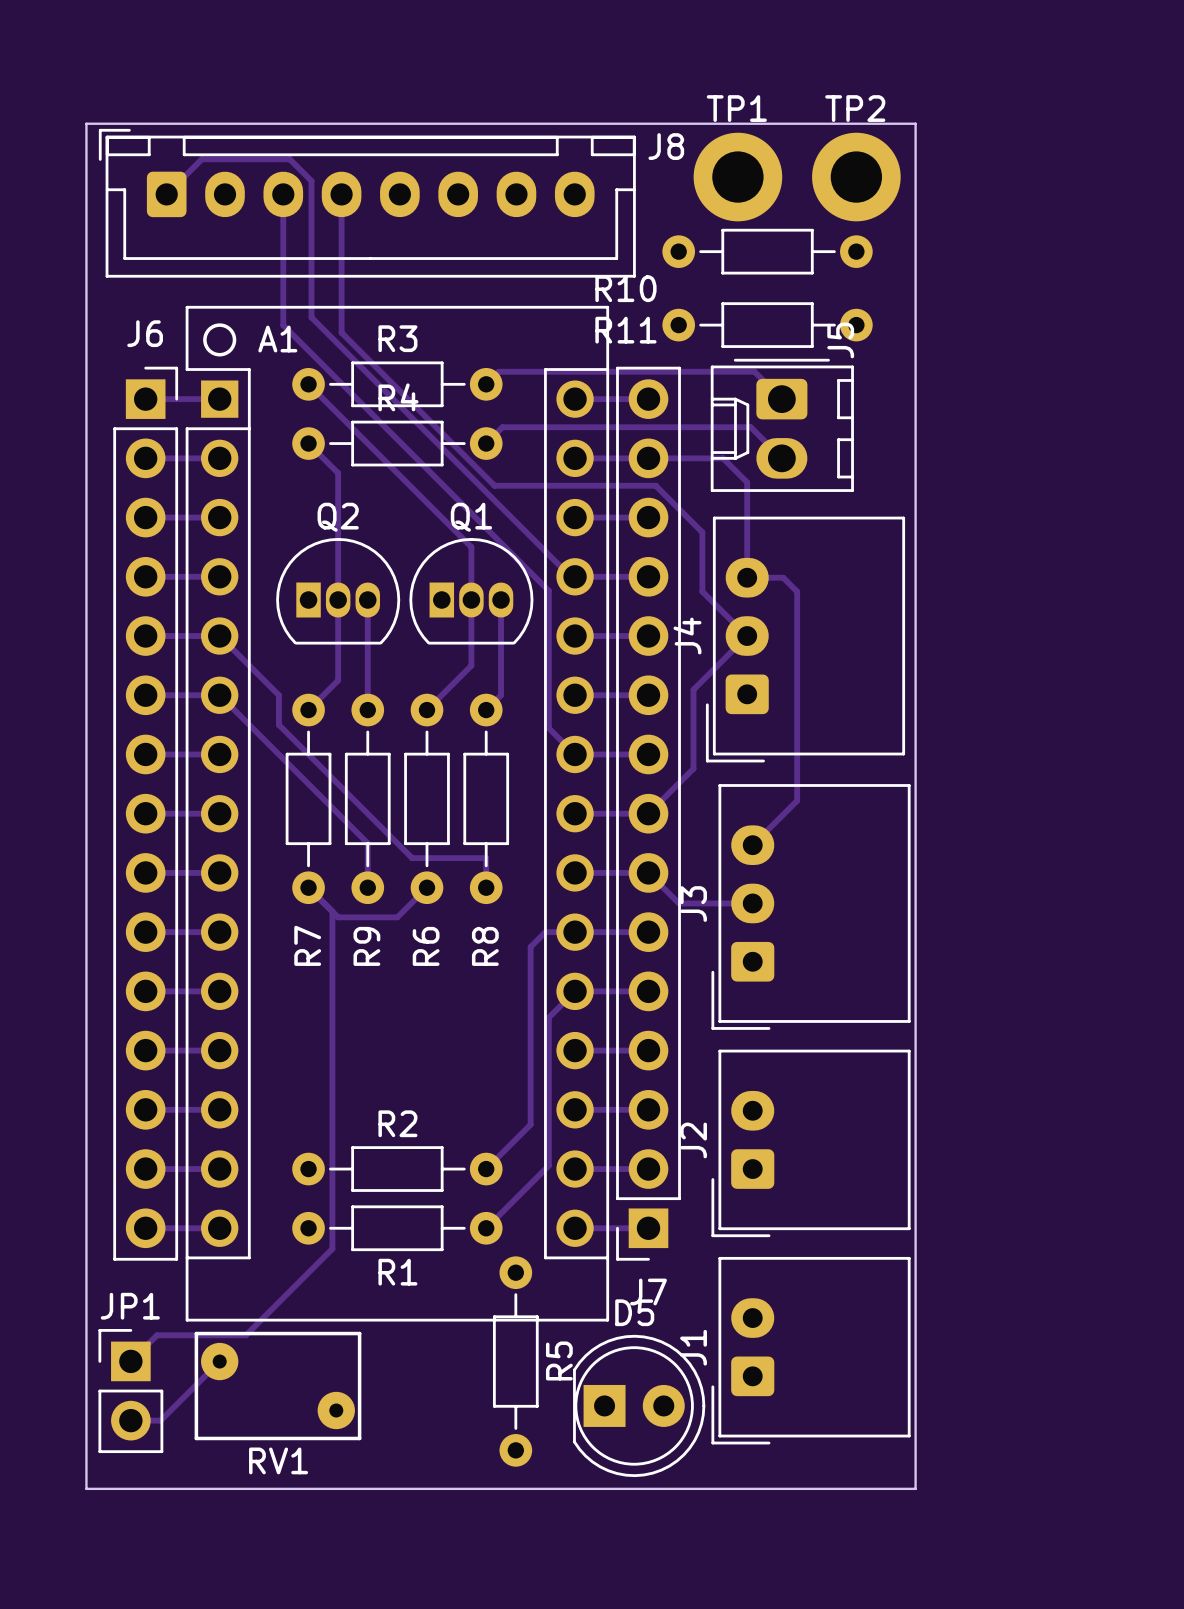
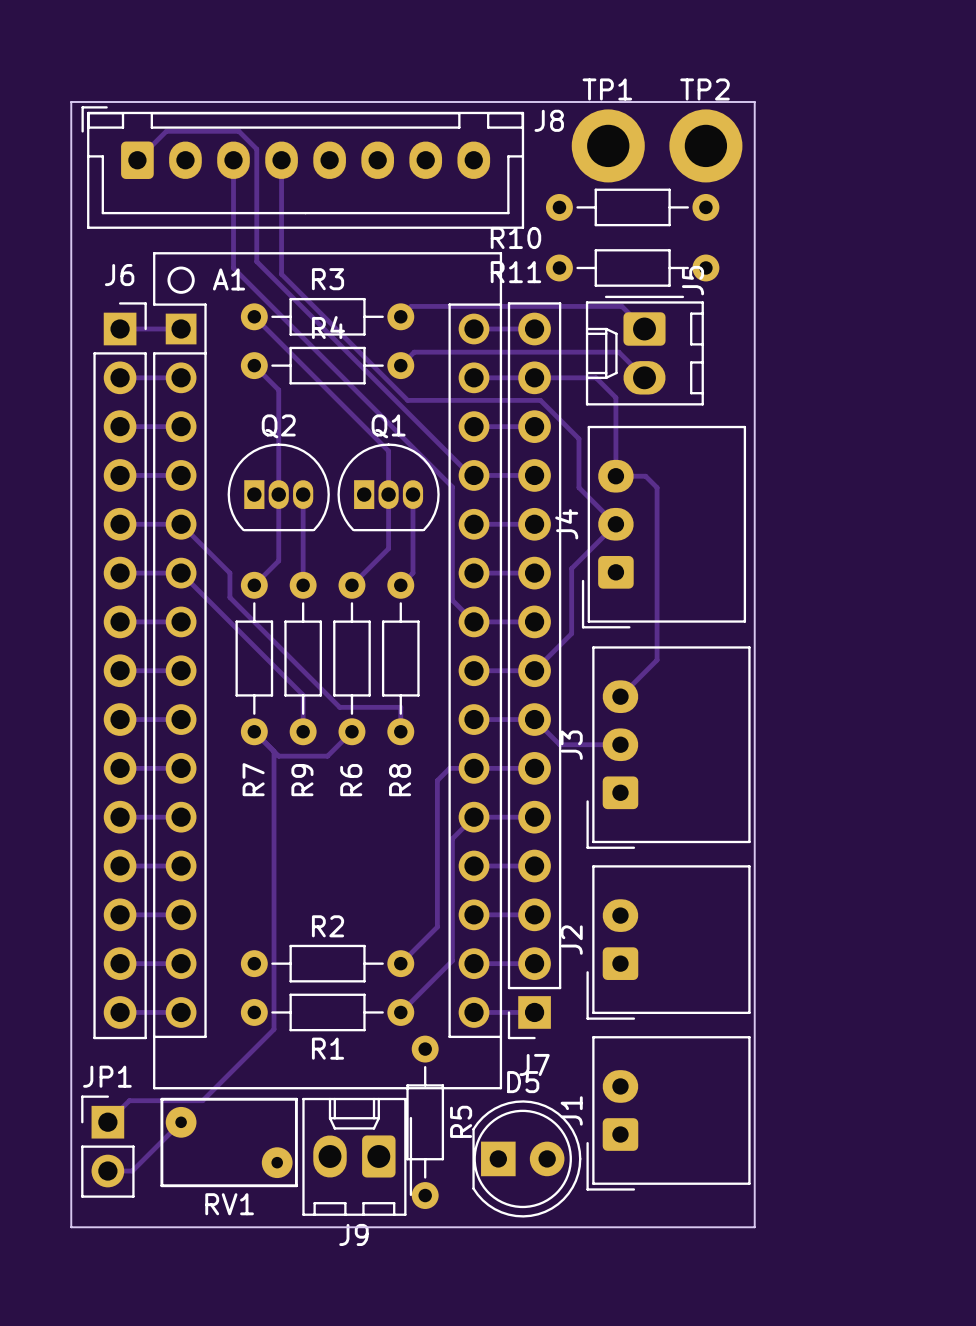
J9: none -> (357, 1156)

